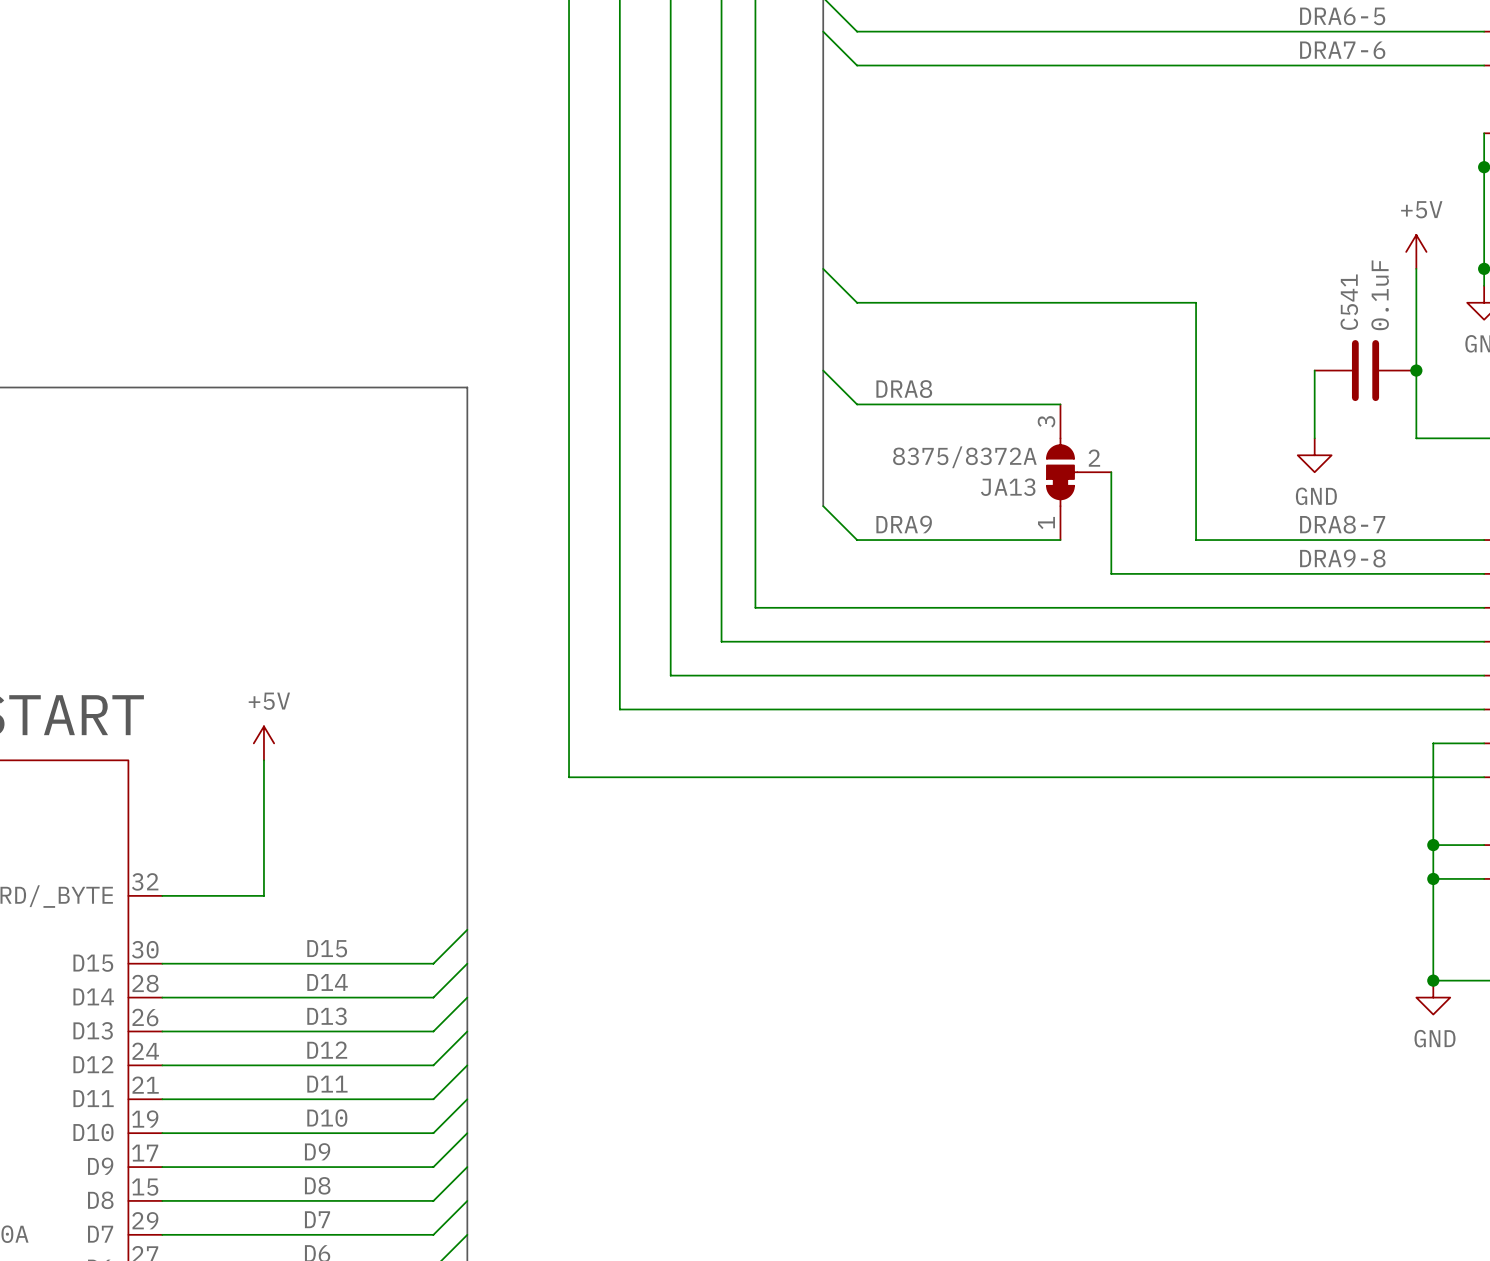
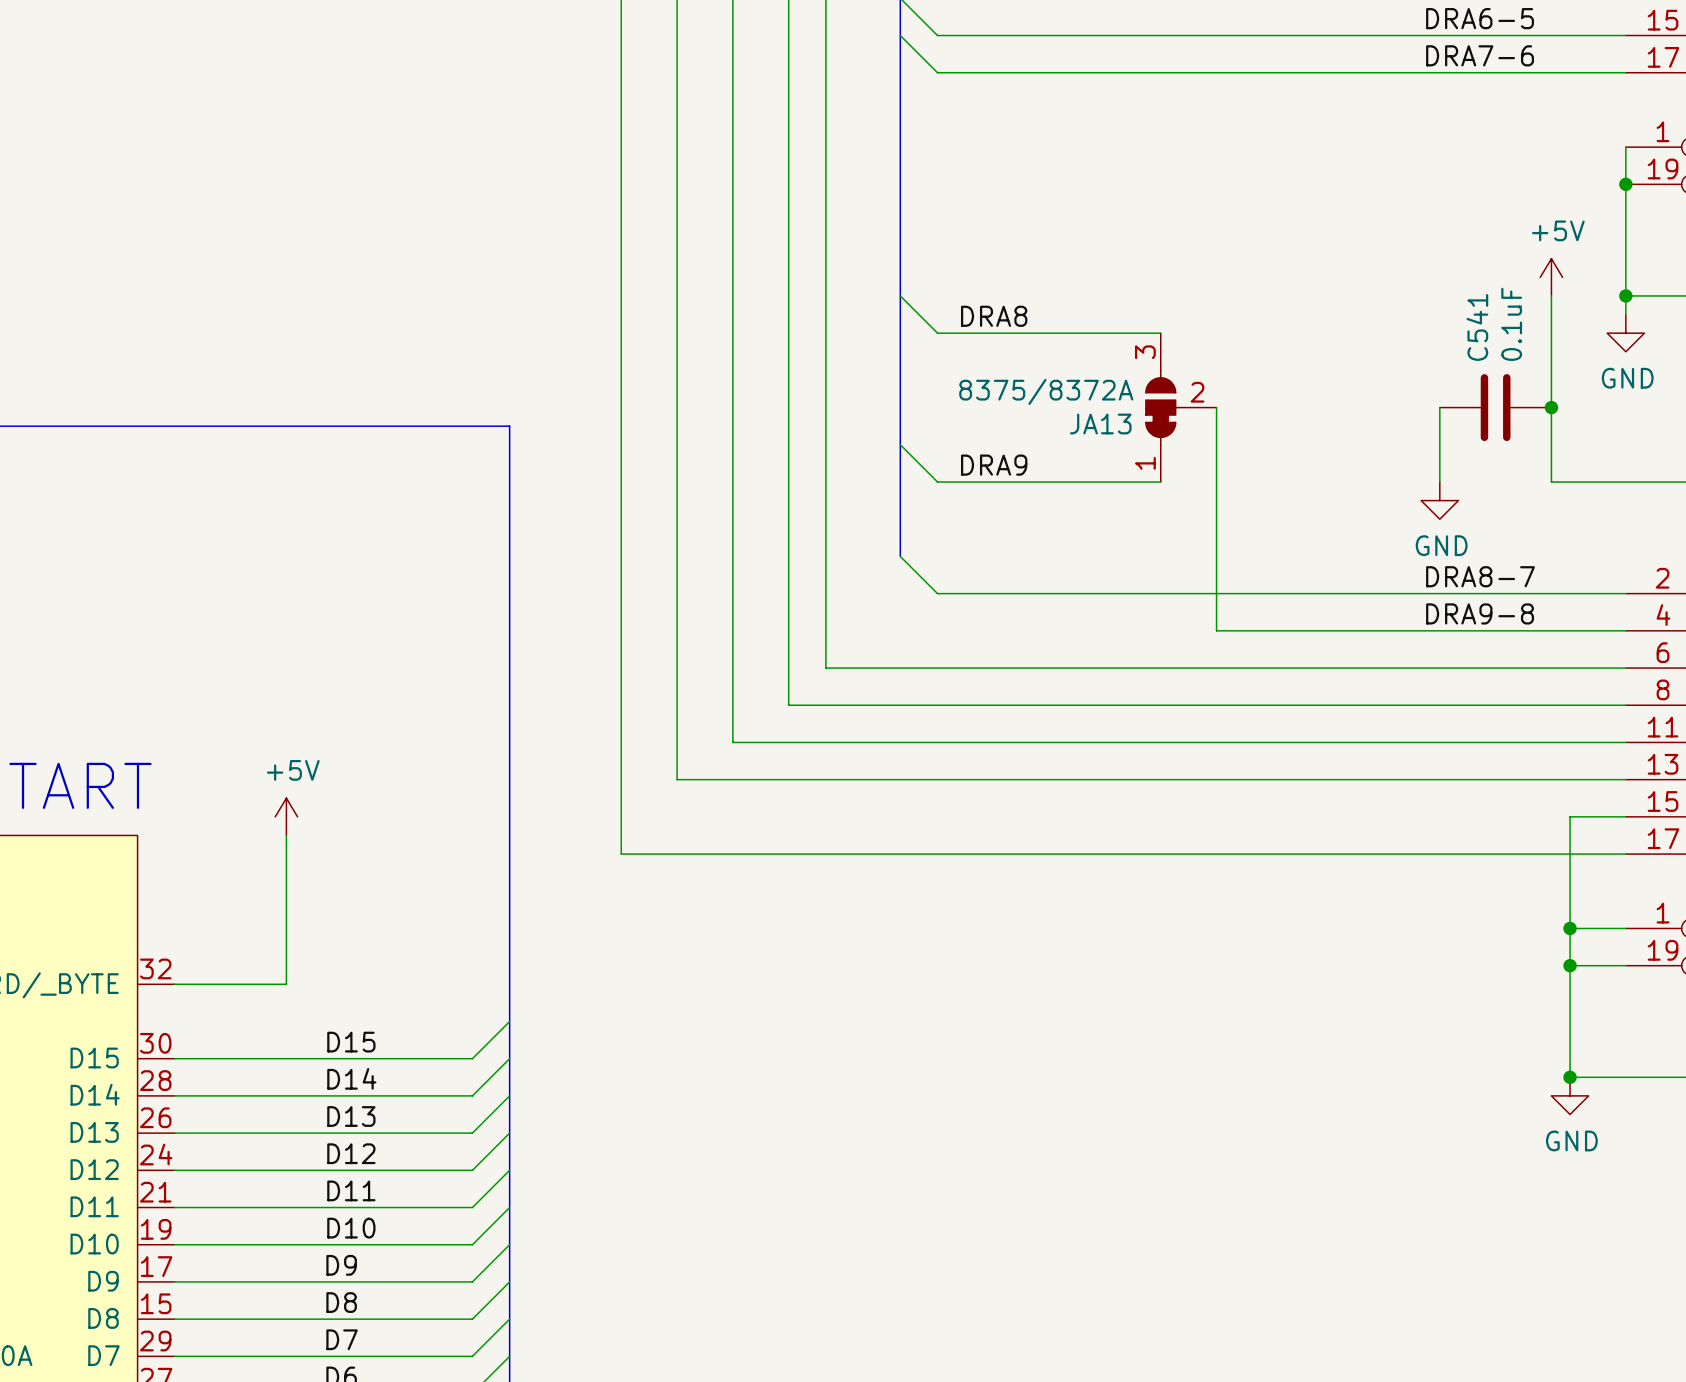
wire: (1060, 302) (1196, 302) (1196, 540) -> (1160, 593) (1309, 593)
wire: (823, 370) (857, 404) (1060, 404) -> (900, 444) (937, 482) (1160, 482)
wire: none -> (1216, 407) (1216, 519)
label position: DRA8 (904, 389) -> DRA8 (994, 316)
JA13 position: (1079, 472) -> (1181, 407)
label position: DRA9 (904, 524) -> DRA9 (994, 465)

